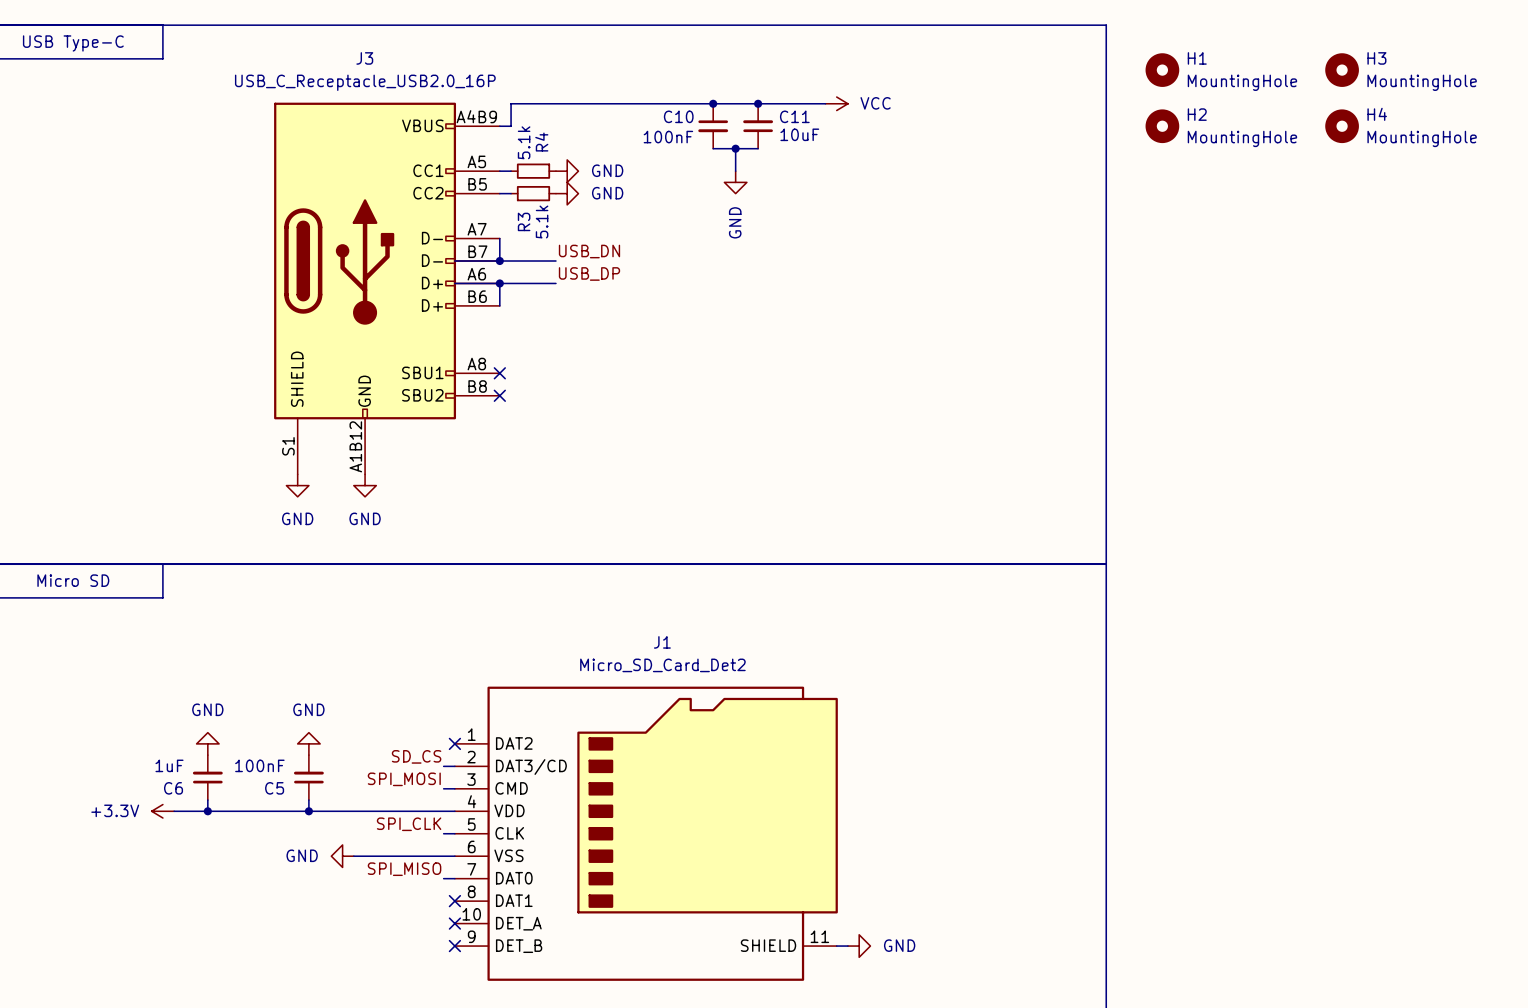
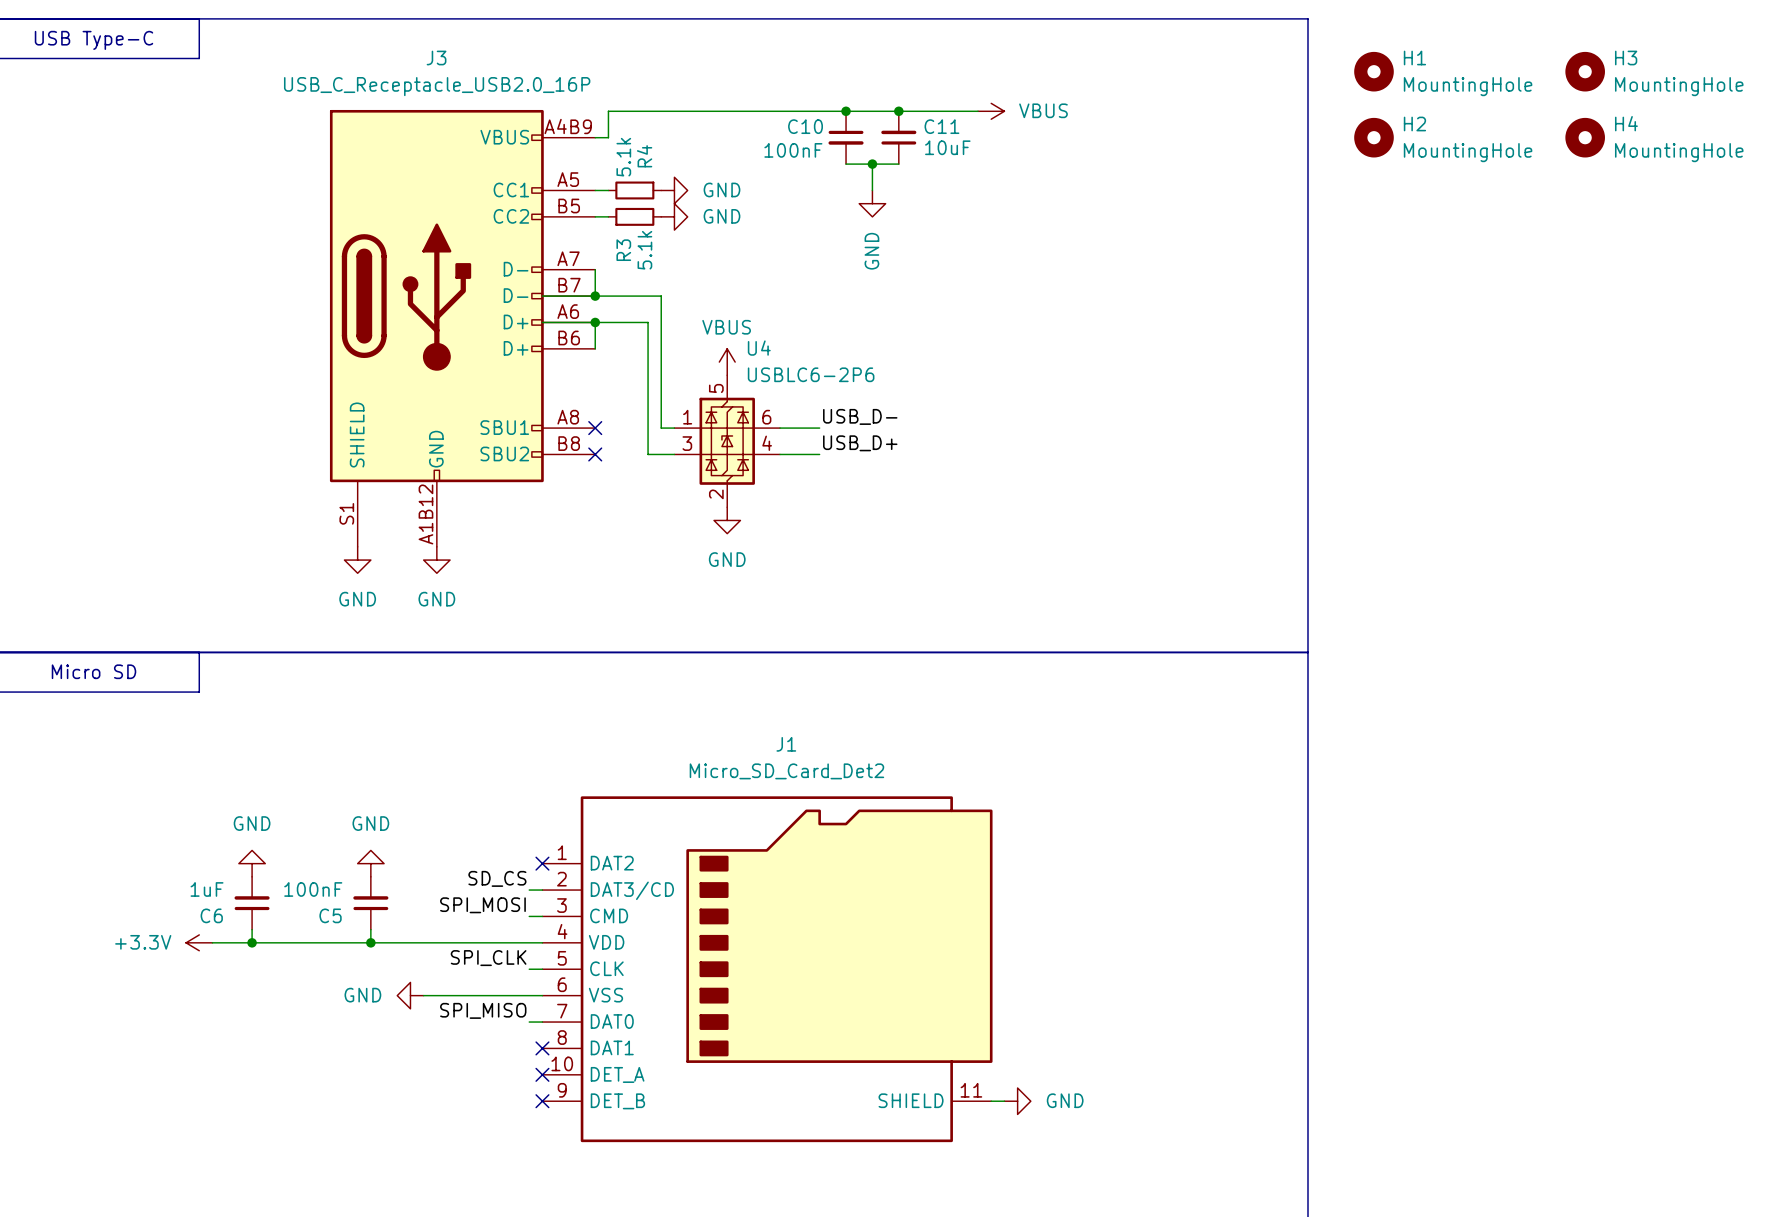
power symbol: VCC (836, 103) -> VBUS (991, 111)
label: USB_DN (589, 251) -> none
wire: none -> (661, 296) (661, 428) (674, 428)
label: USB_DP (589, 273) -> none
wire: (544, 283) (555, 283) -> (648, 322) (648, 454) (674, 454)
power symbol: none -> VBUS (727, 362)
label: none -> USB_D- (860, 416)
wire: none -> (780, 428) (819, 428)
U4: none -> USBLC6-2P6 (727, 441)
label: none -> USB_D+ (860, 443)
wire: none -> (780, 454) (819, 454)
power symbol: none -> GND (727, 520)

